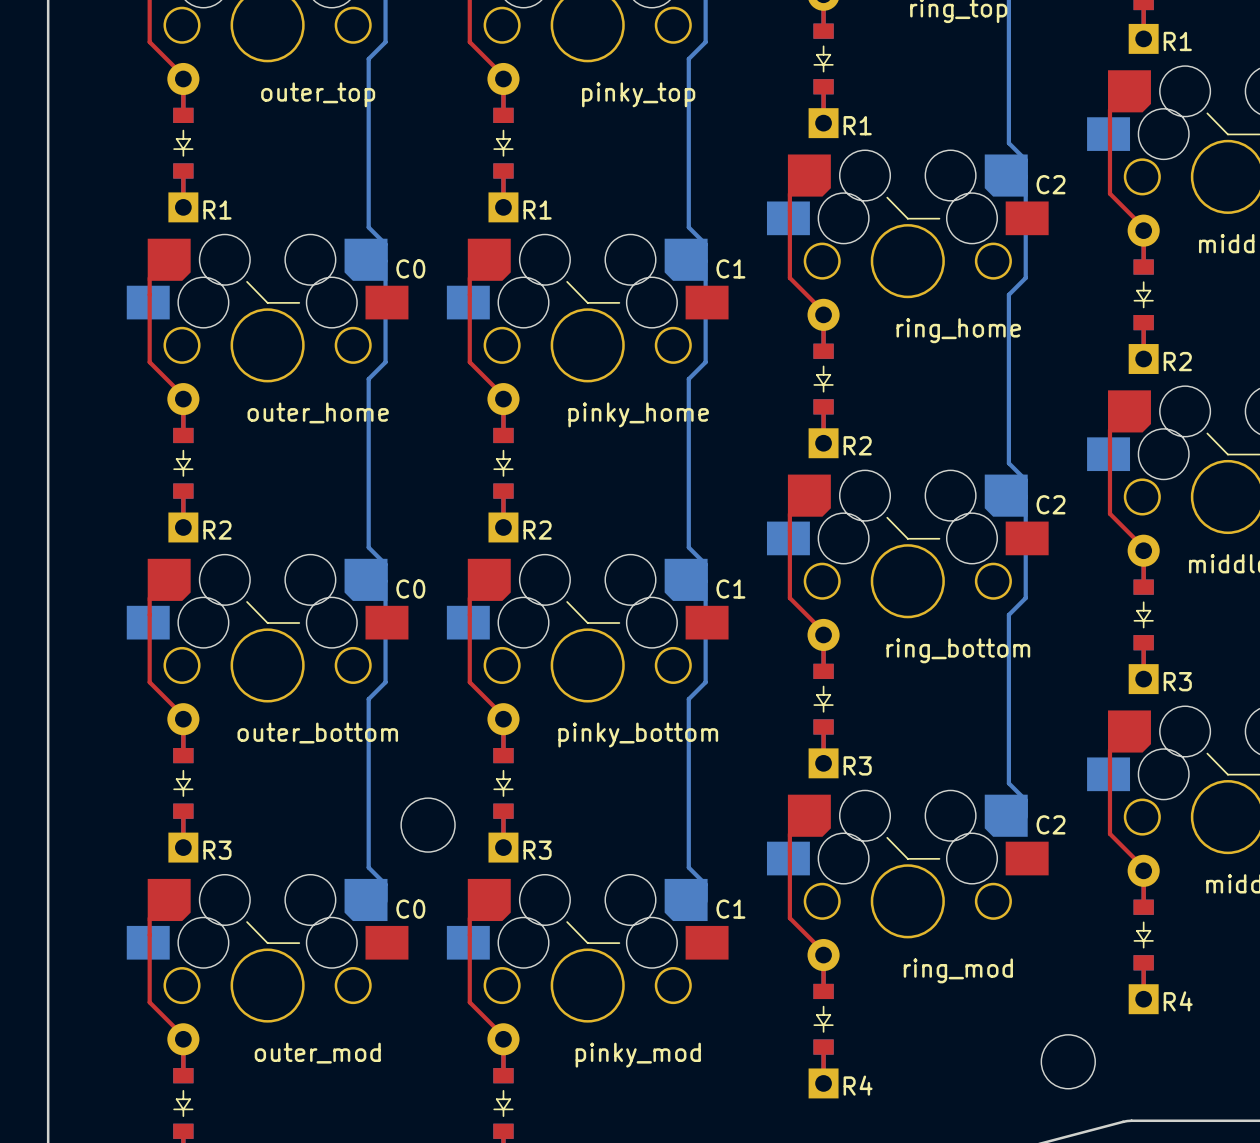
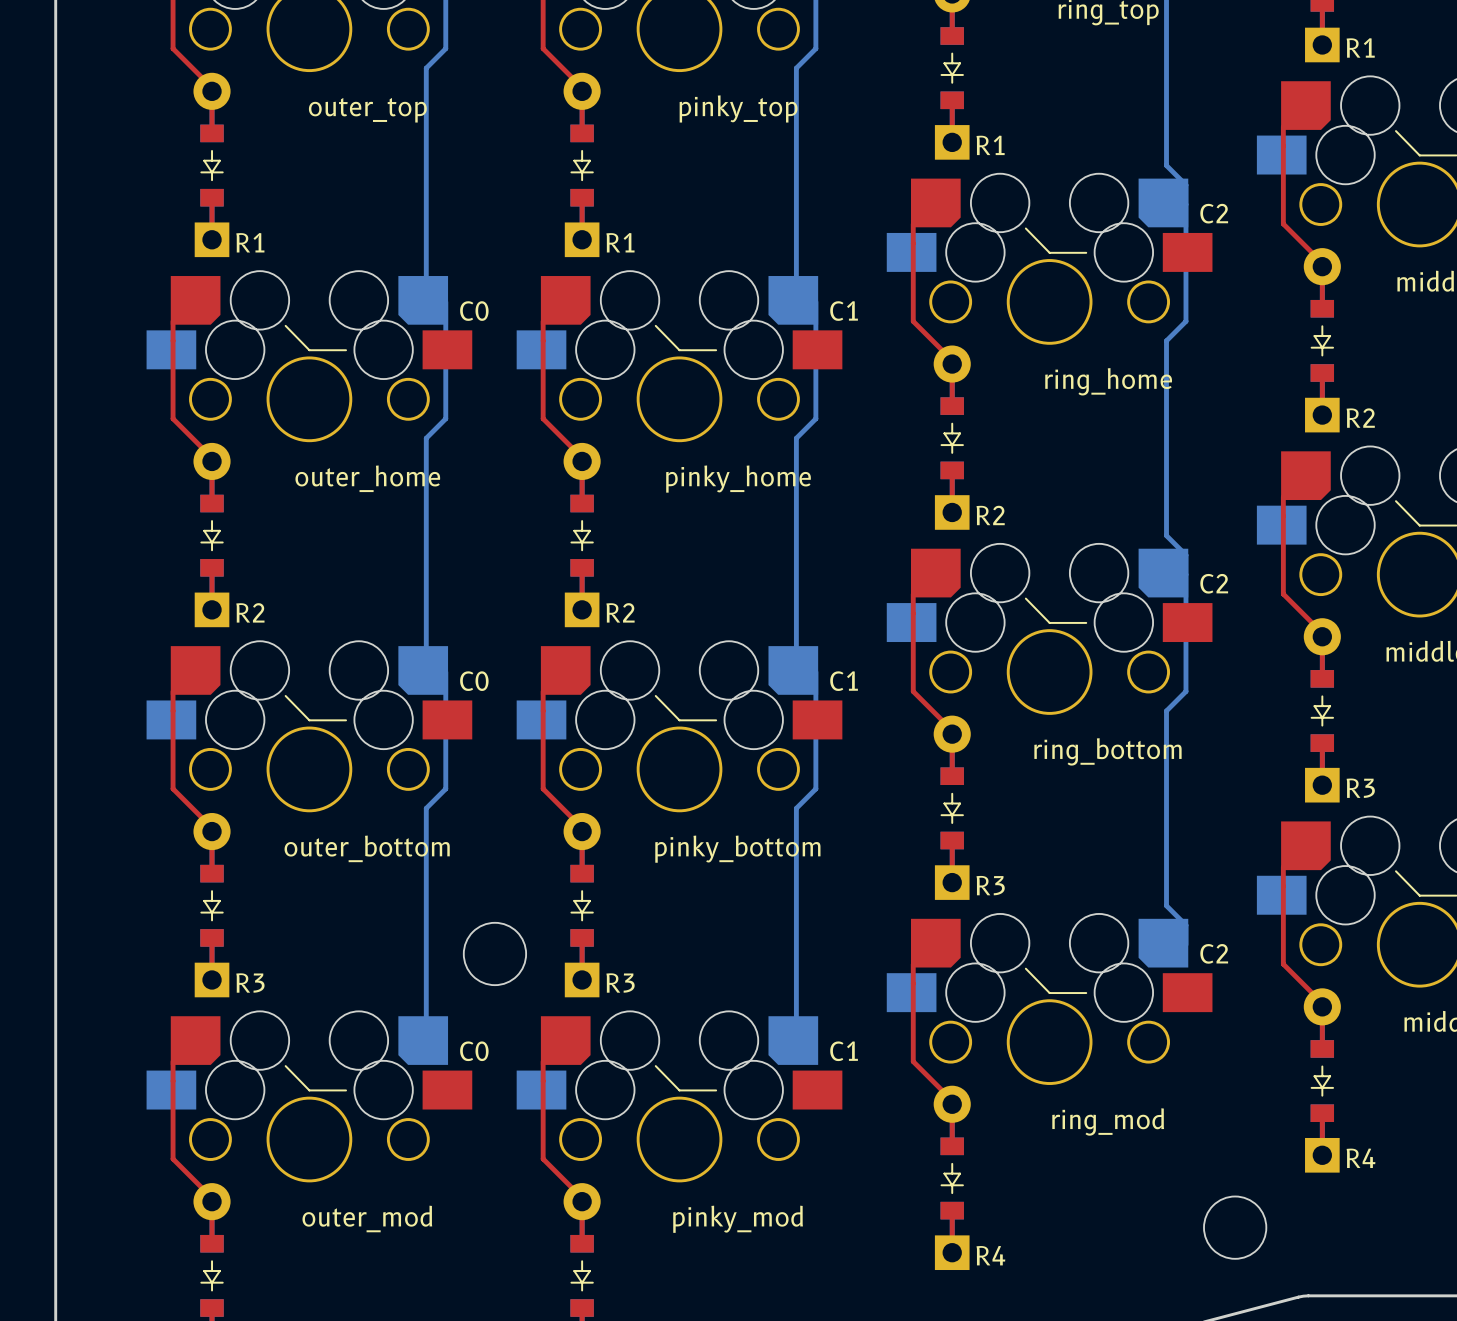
bottom track: (368, 227) (385, 244) (385, 261) -> (426, 262) (426, 282)
bottom track: (688, 227) (705, 244) (705, 261) -> (796, 262) (796, 282)
bottom track: (368, 547) (385, 564) (385, 581) -> (426, 633) (426, 652)
bottom track: (688, 547) (705, 564) (705, 581) -> (796, 633) (796, 652)
bottom track: (368, 867) (385, 884) (385, 901) -> (426, 1003) (426, 1022)
bottom track: (688, 867) (705, 884) (705, 901) -> (796, 1003) (796, 1022)

